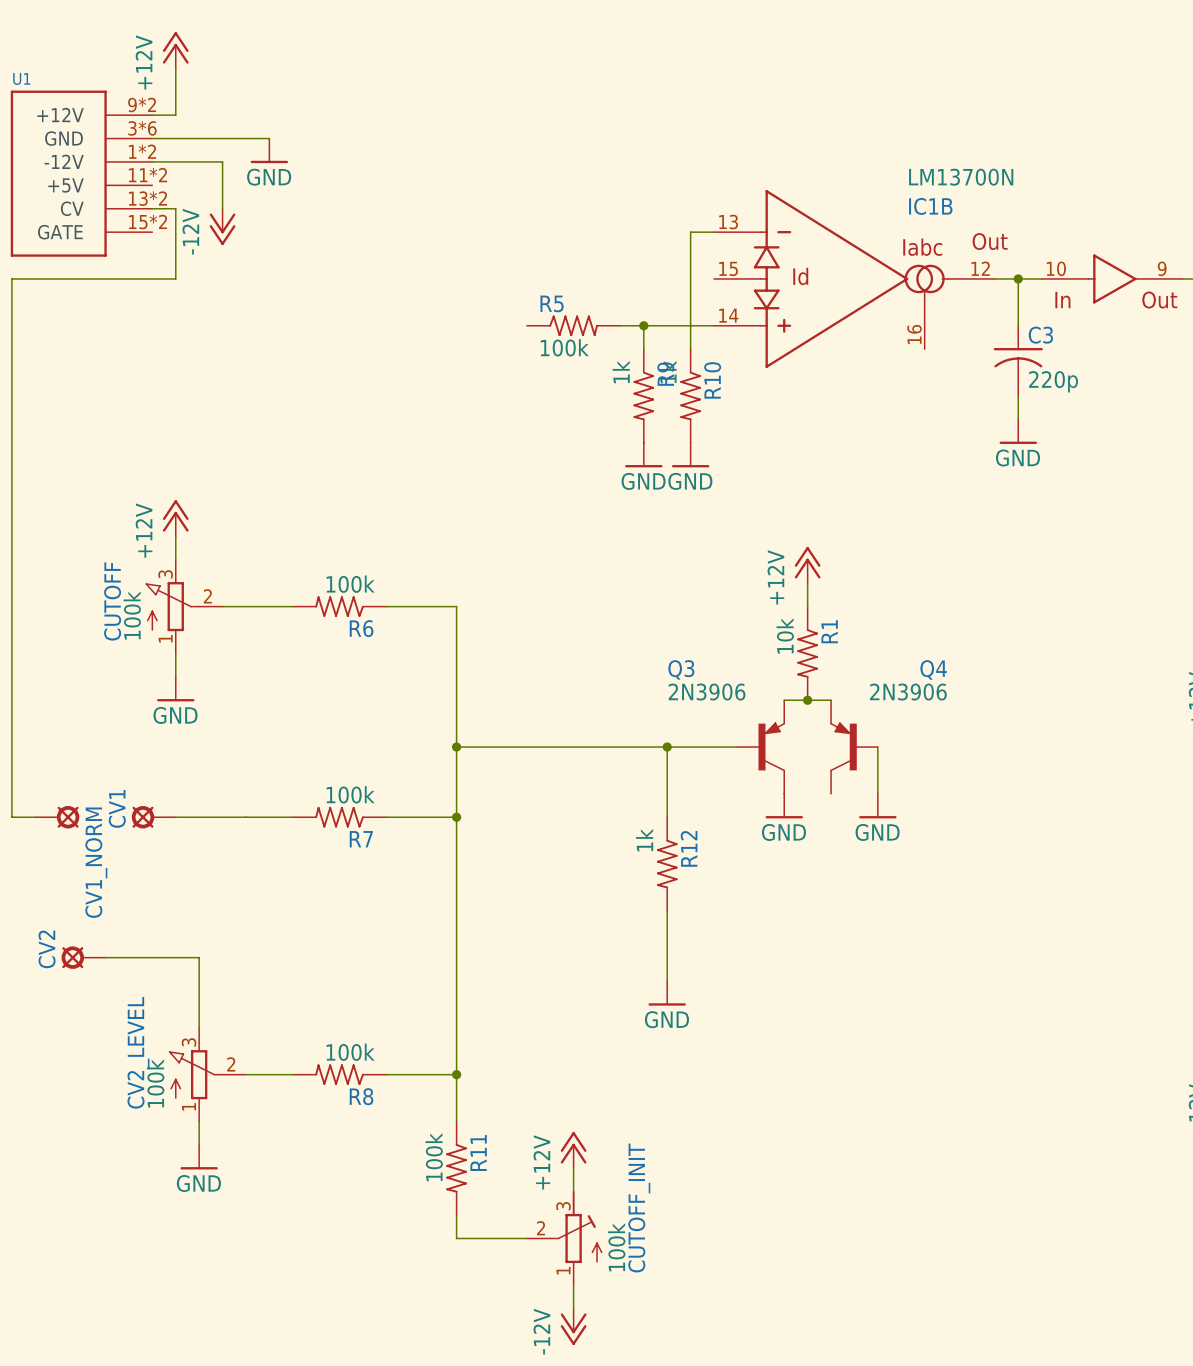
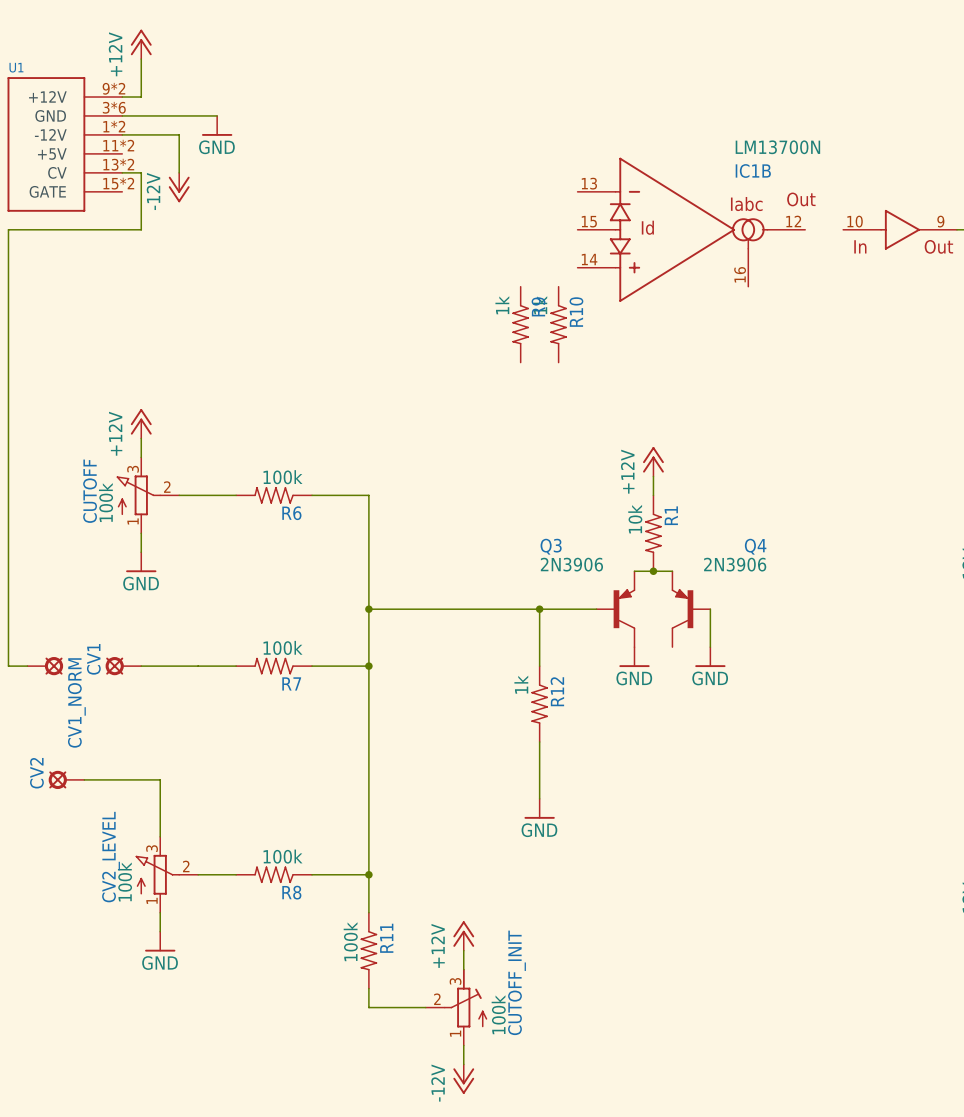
wire: (714, 232) (690, 232) (690, 349) -> none
wire: (994, 278) (1041, 278) -> none
wire: (1018, 278) (1018, 325) -> none
junction: (1018, 278) -> none
R5: 100k (573, 325) -> none
wire: (620, 325) (714, 325) -> none
wire: (643, 325) (643, 349) -> none
junction: (643, 325) -> none
C3: 220p (1018, 360) -> none
wire: (1018, 395) (1018, 419) -> none
power symbol: GND (1018, 431) -> none
power symbol: GND (643, 455) -> none
power symbol: GND (690, 455) -> none

